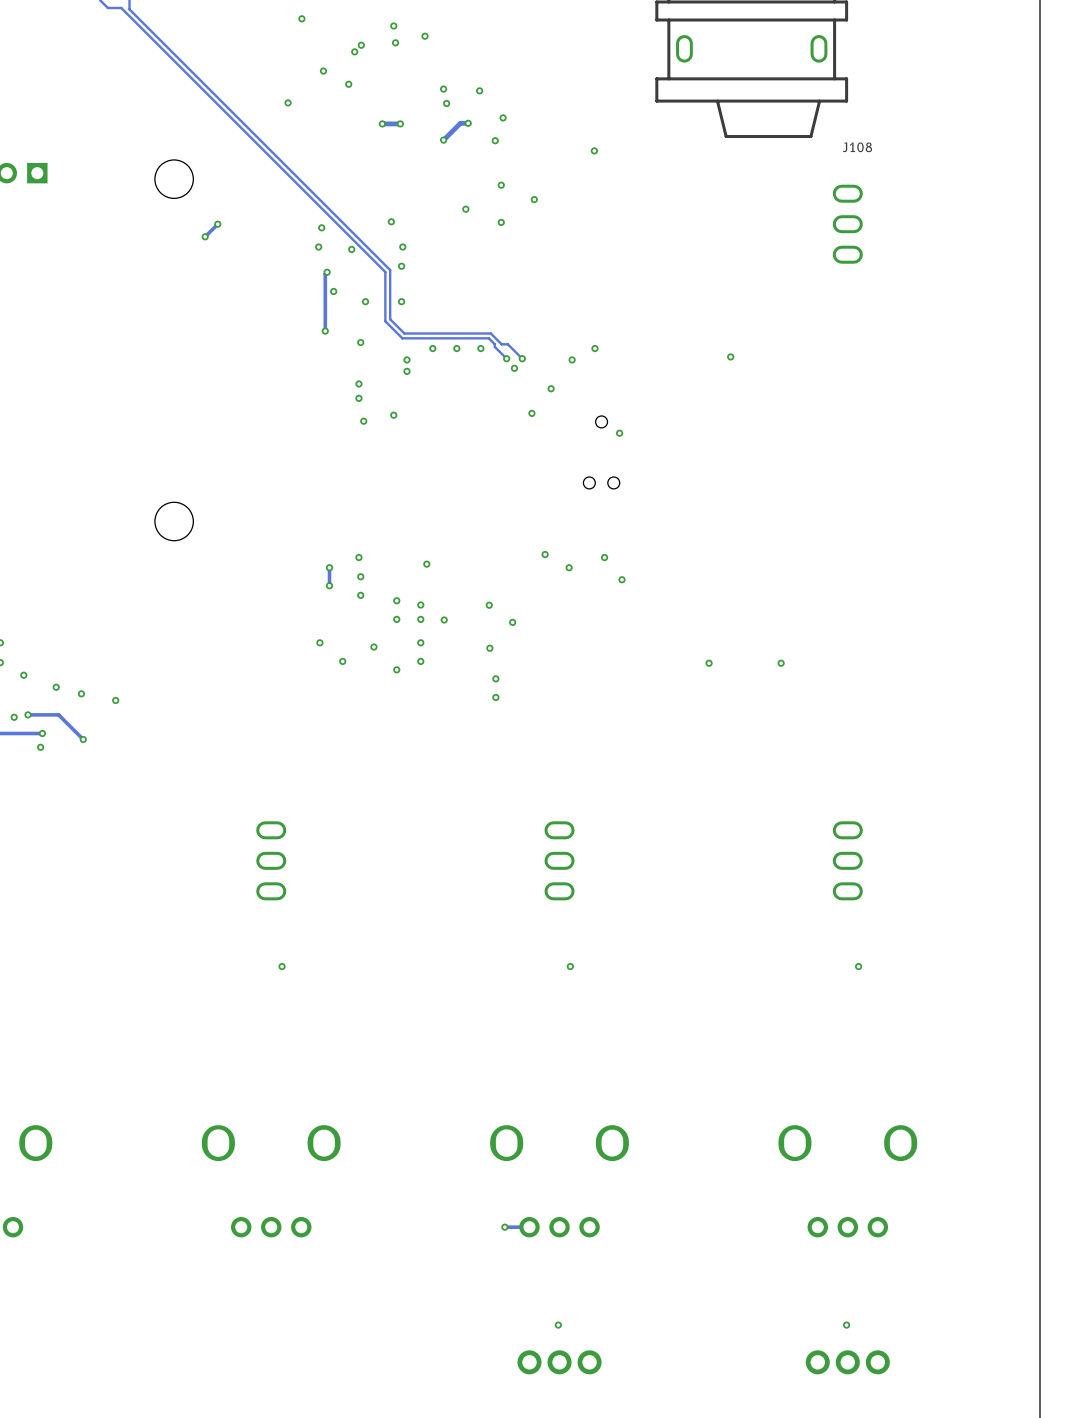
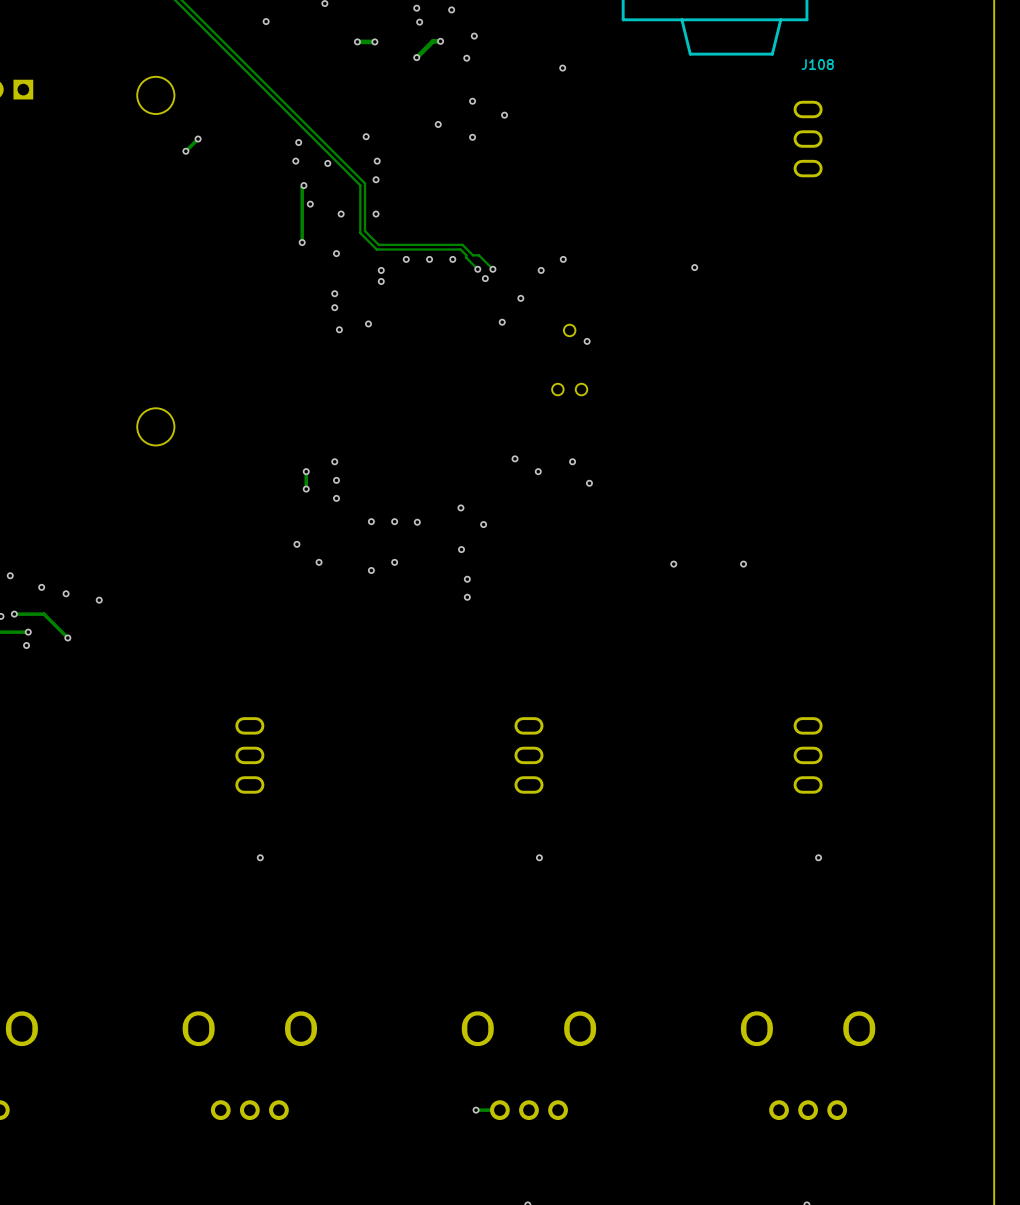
via: (426, 564) -> none
via: (396, 600) -> none
via: (420, 604) -> none
via: (420, 642) -> none
via: (373, 647) -> none

